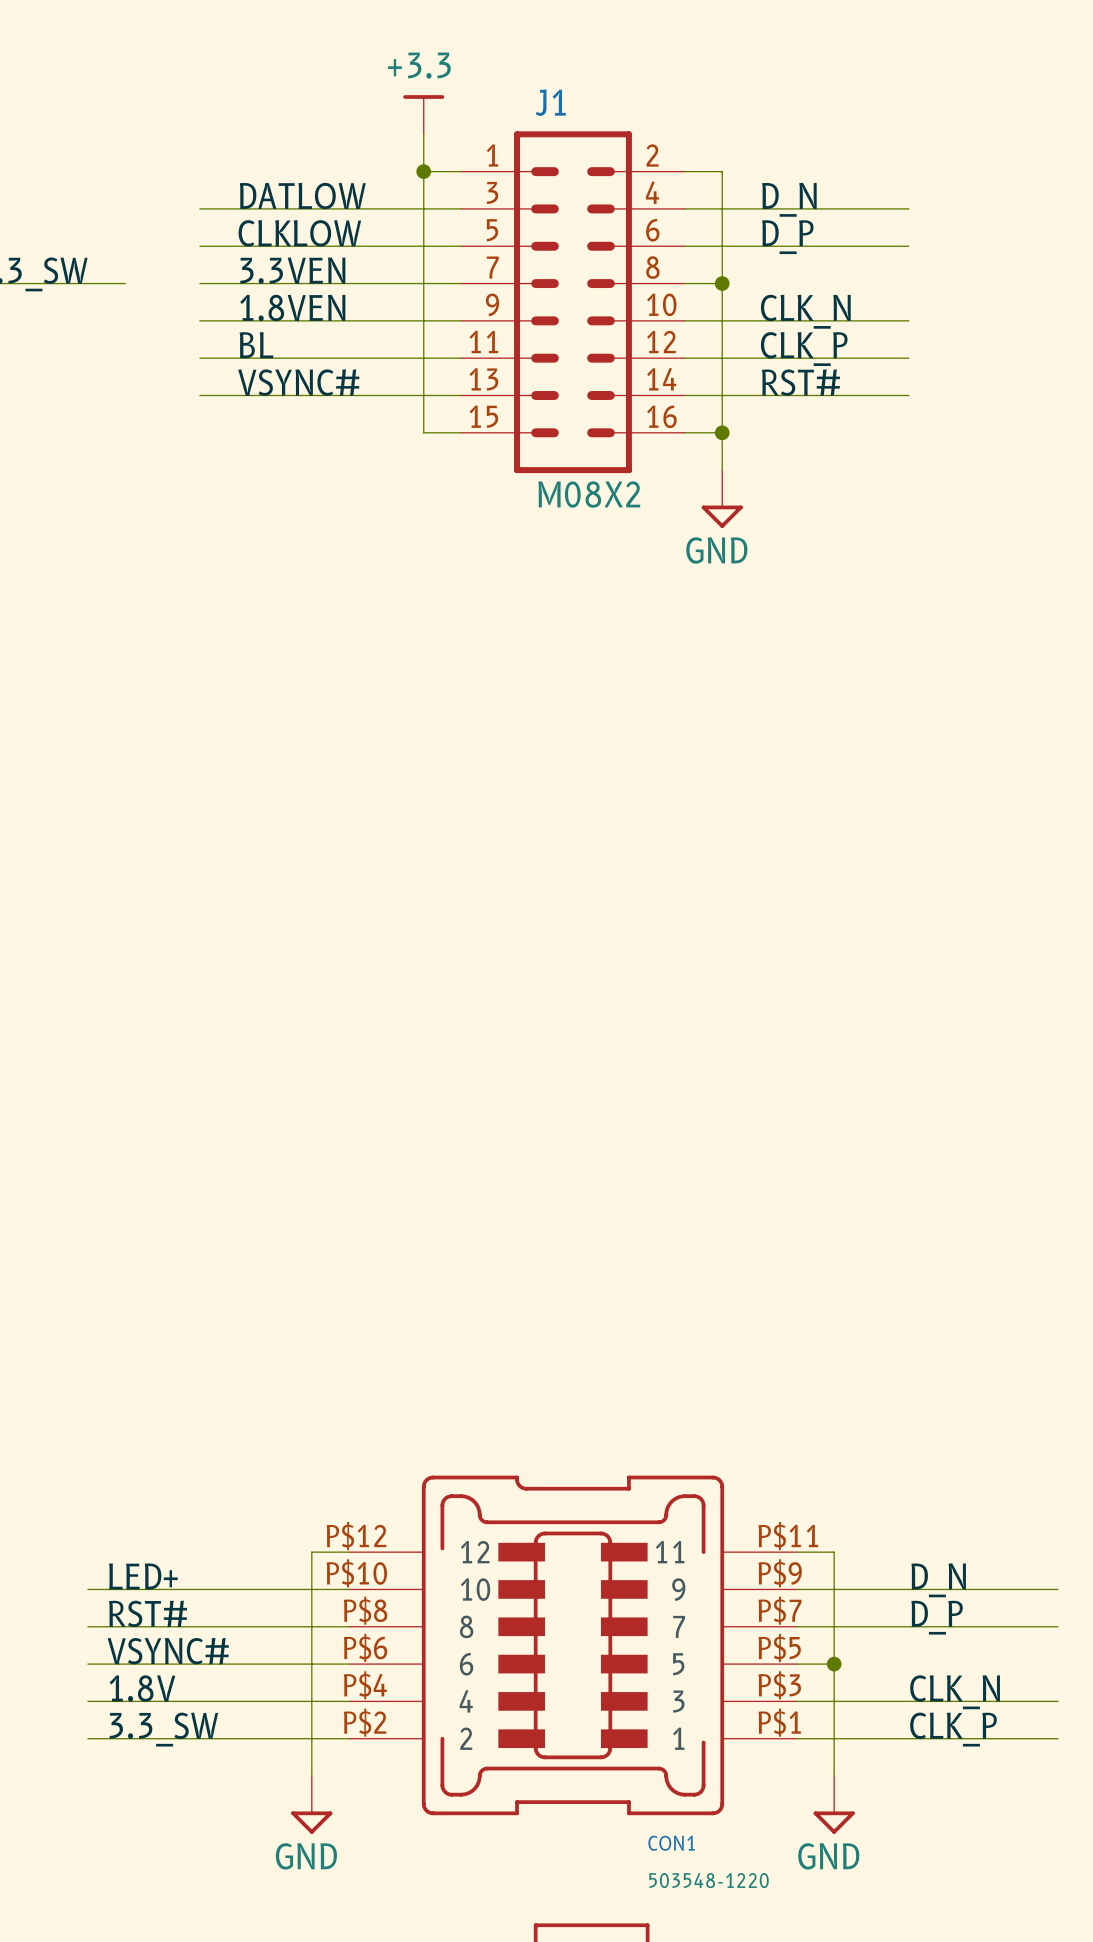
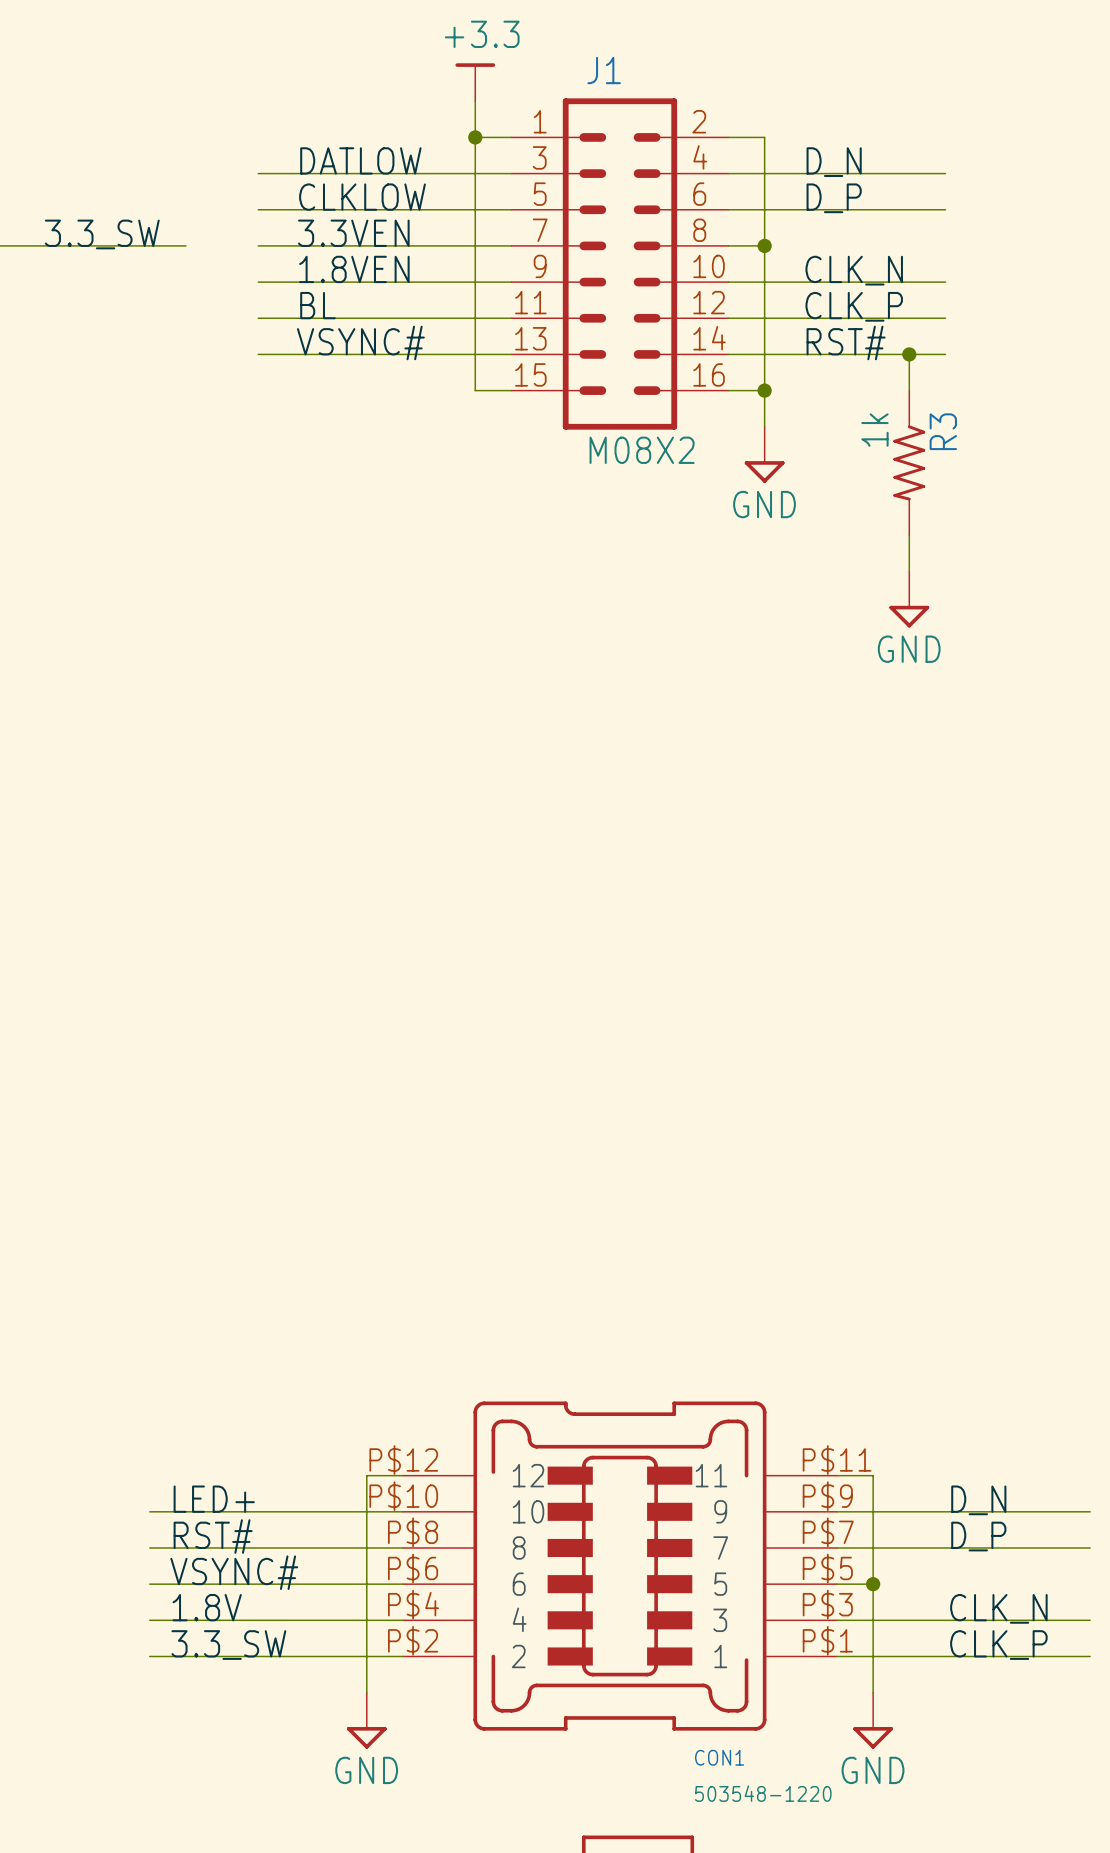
wire: none -> (909, 354) (909, 390)
junction: none -> (909, 354)
R3: none -> 1k (909, 462)
wire: none -> (909, 535) (909, 571)
power symbol: none -> GND (909, 599)

